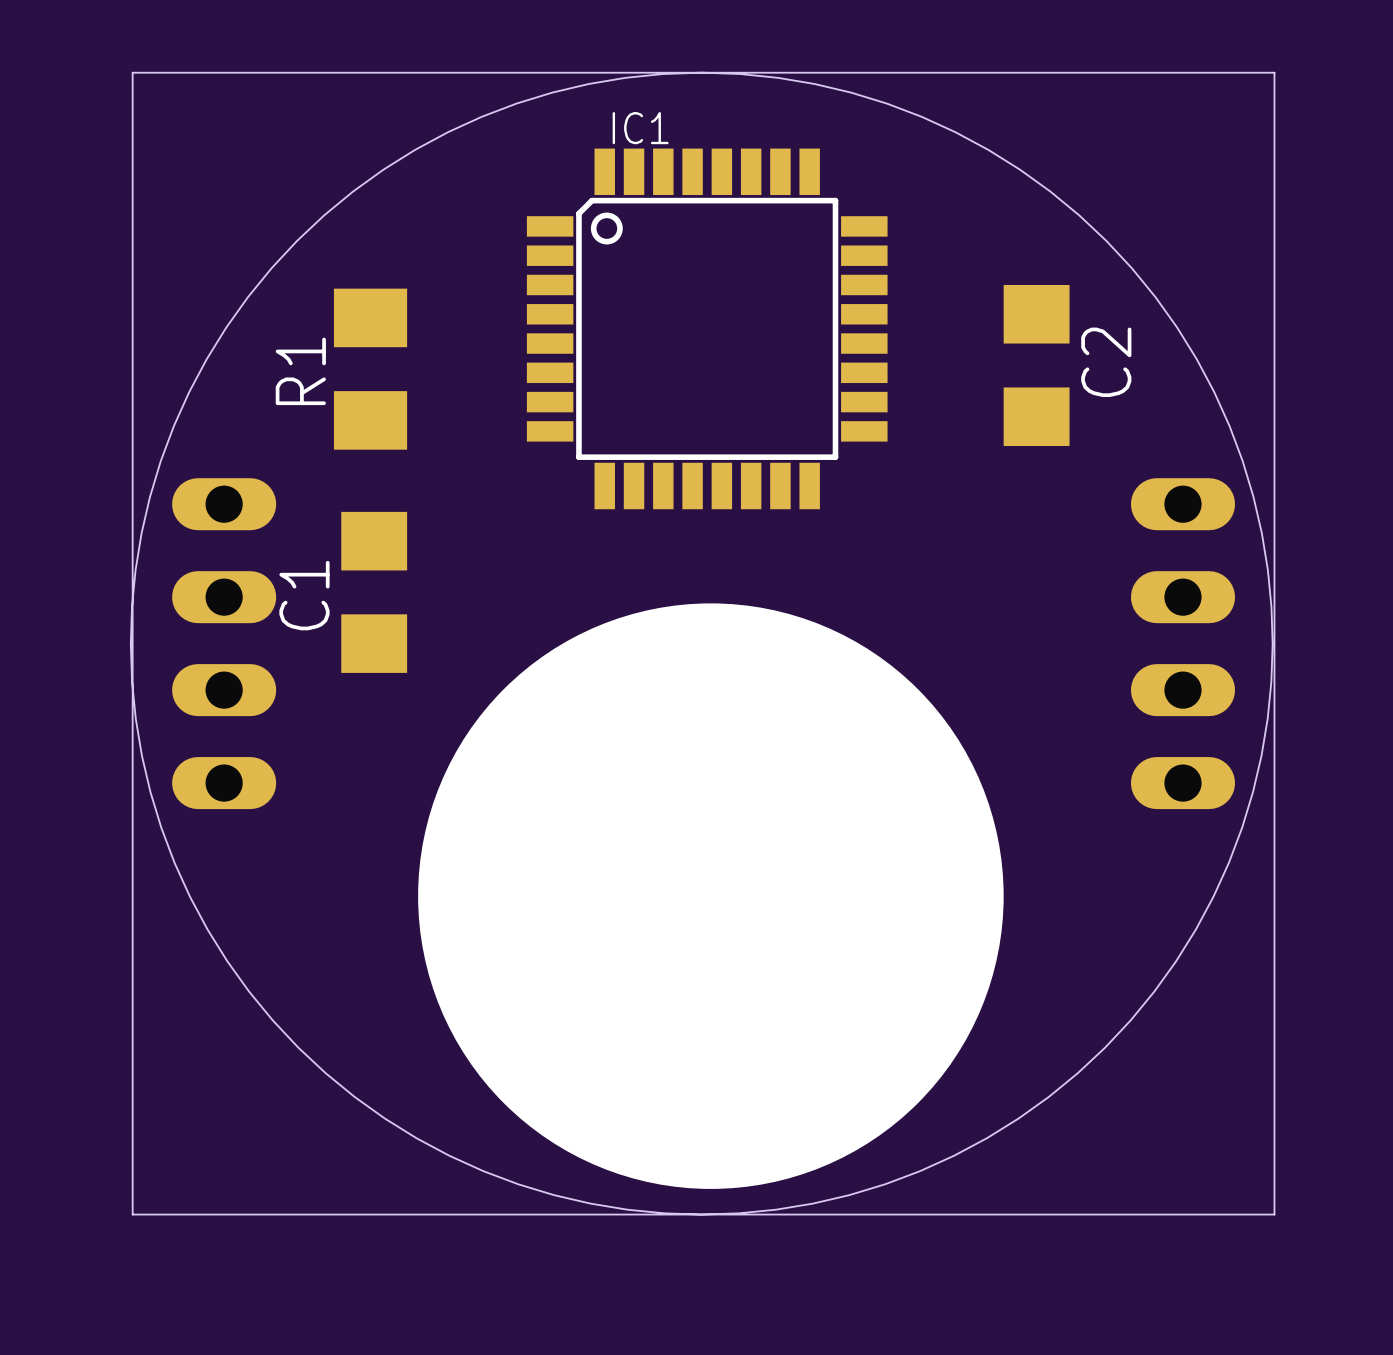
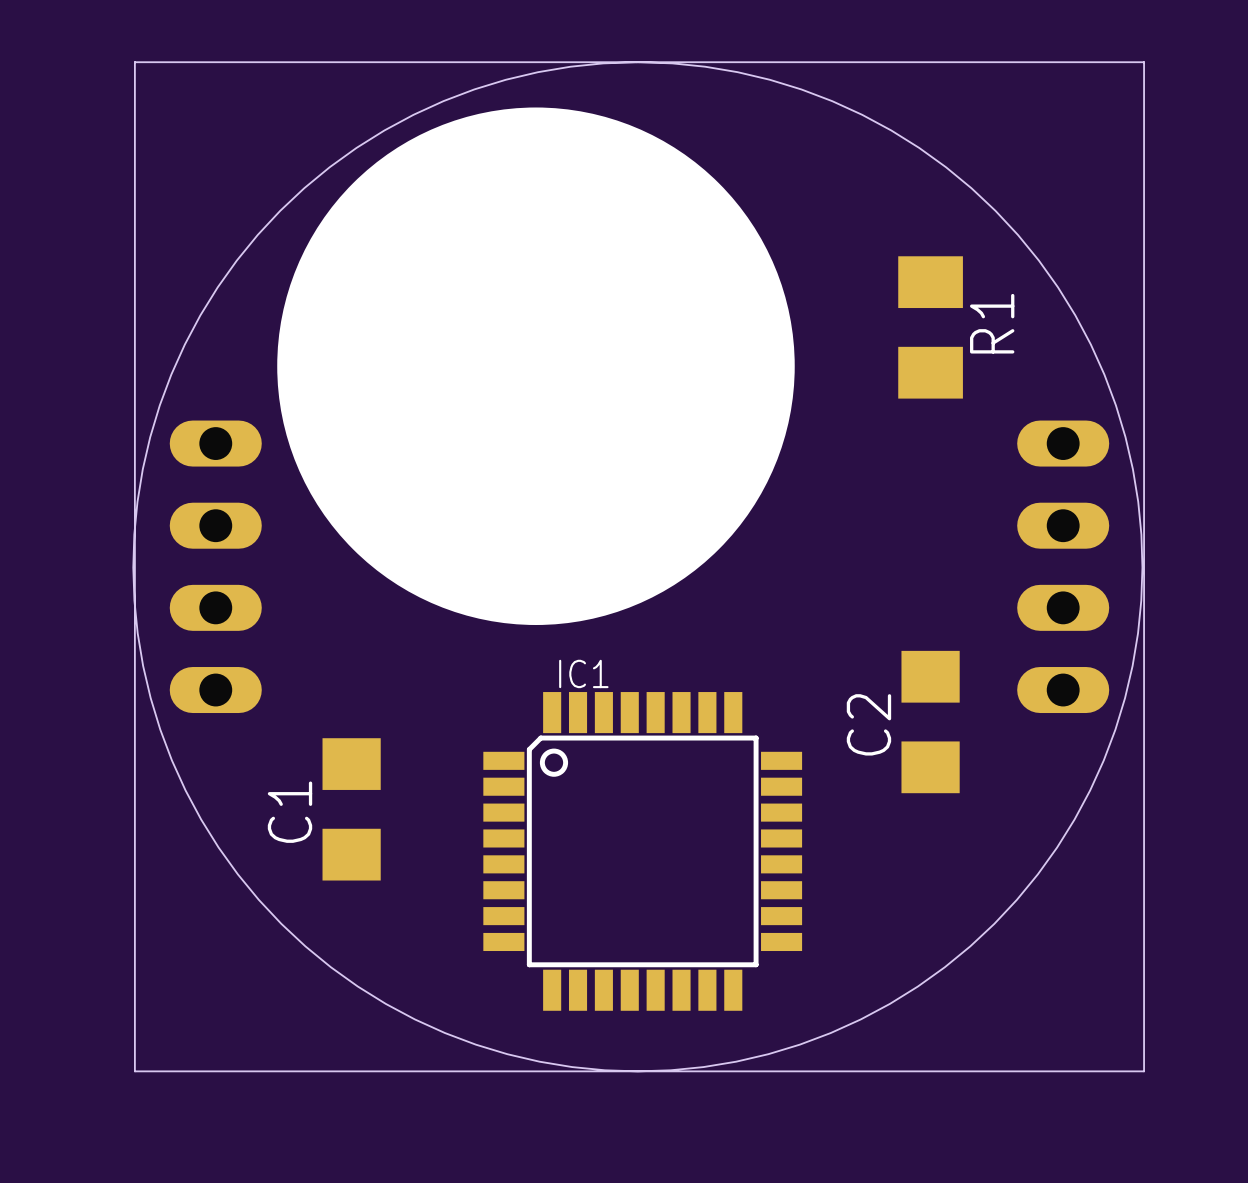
IC1 position: (707, 328) -> (642, 851)
C2 name position: C2 (1106, 362) -> C2 (868, 724)
C2 position: (1036, 365) -> (930, 722)
R1 position: (370, 369) -> (930, 327)
R1 name position: R1 (300, 371) -> R1 (992, 323)
C1 position: (374, 592) -> (351, 809)
drawing position: (710, 896) -> (535, 366)

